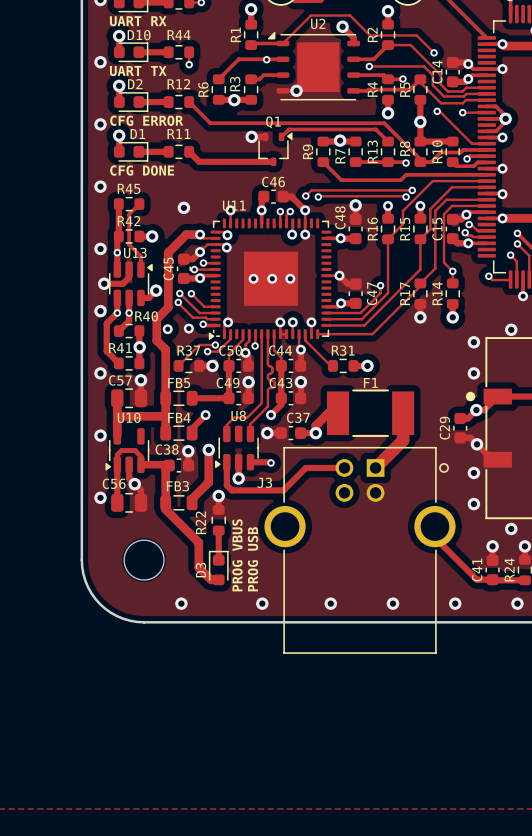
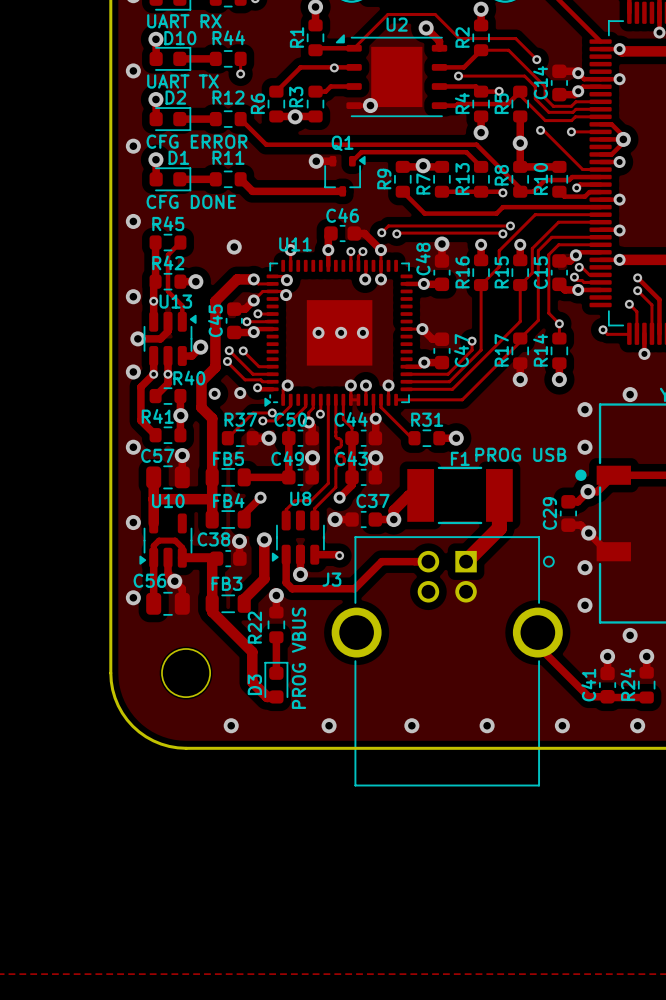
text rotation: 0° (253, 559) -> 90° clockwise (520, 454)
text position: PROG USB (253, 559) -> PROG USB (520, 454)

